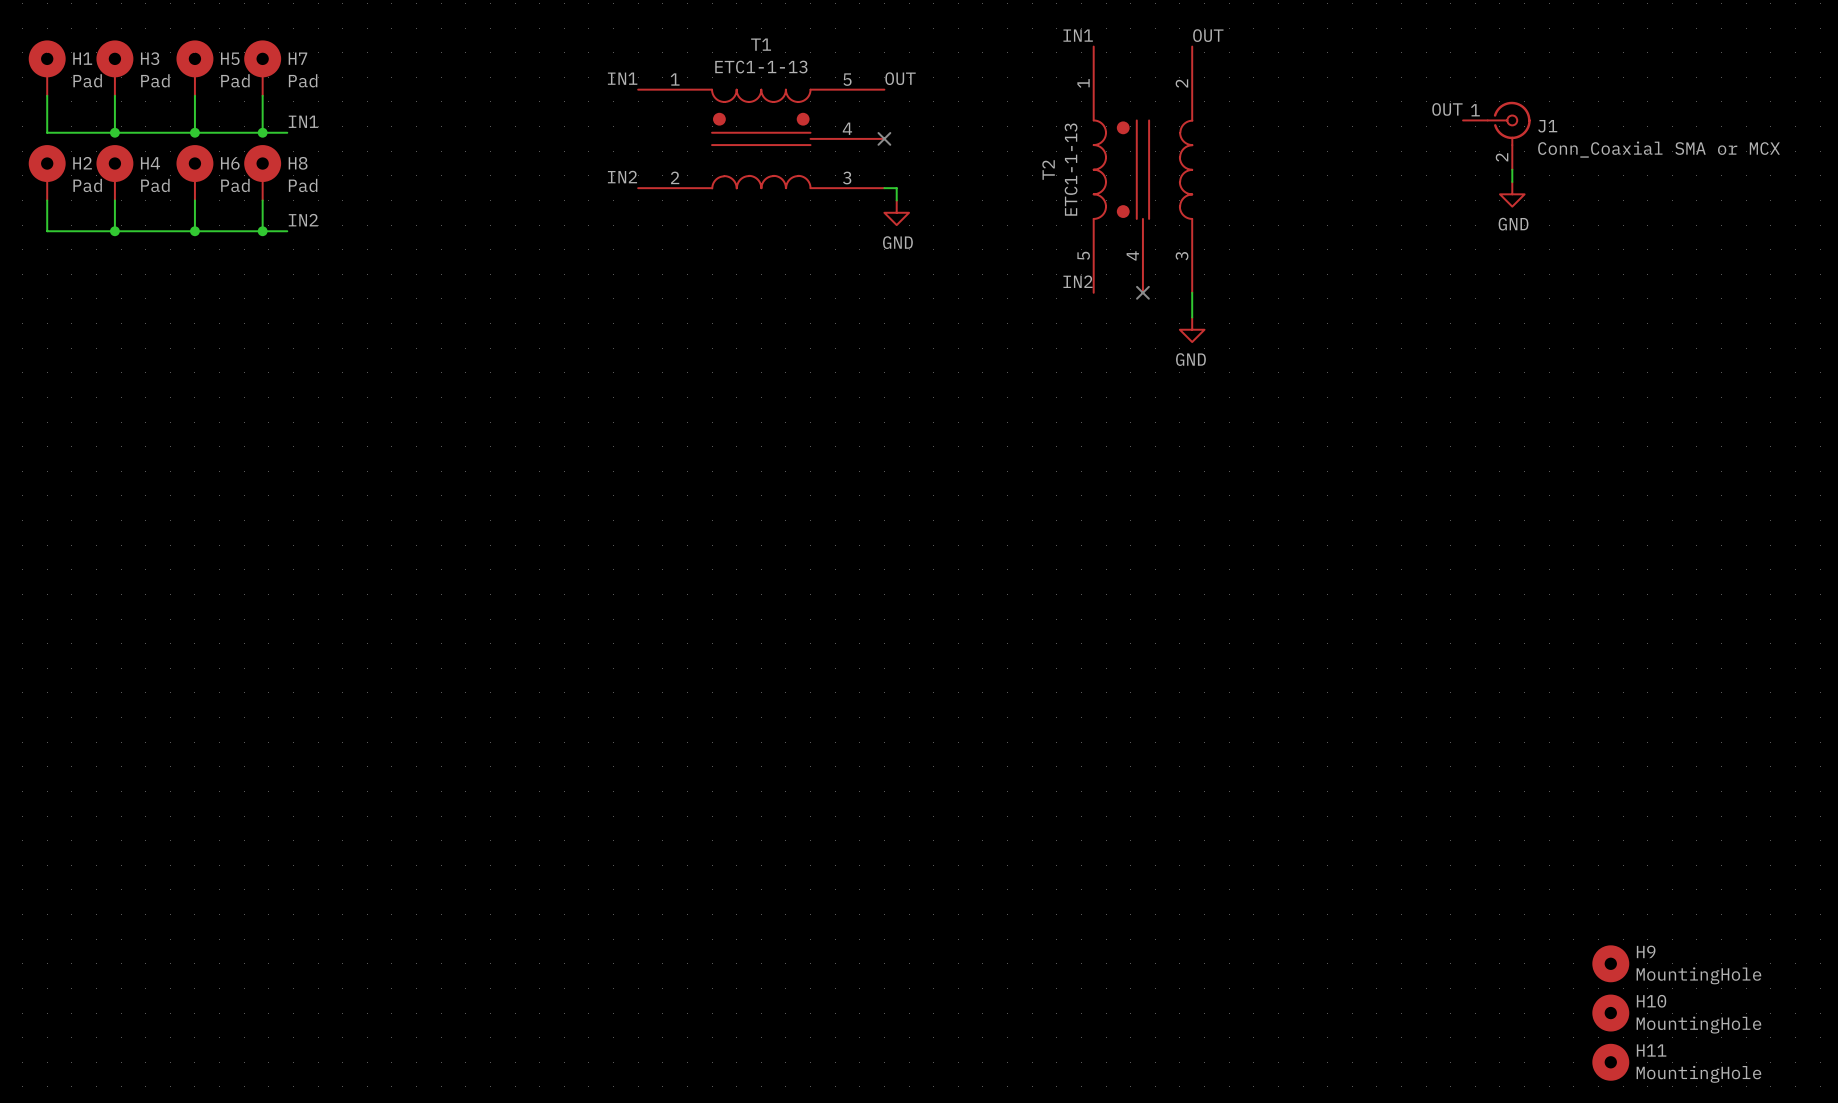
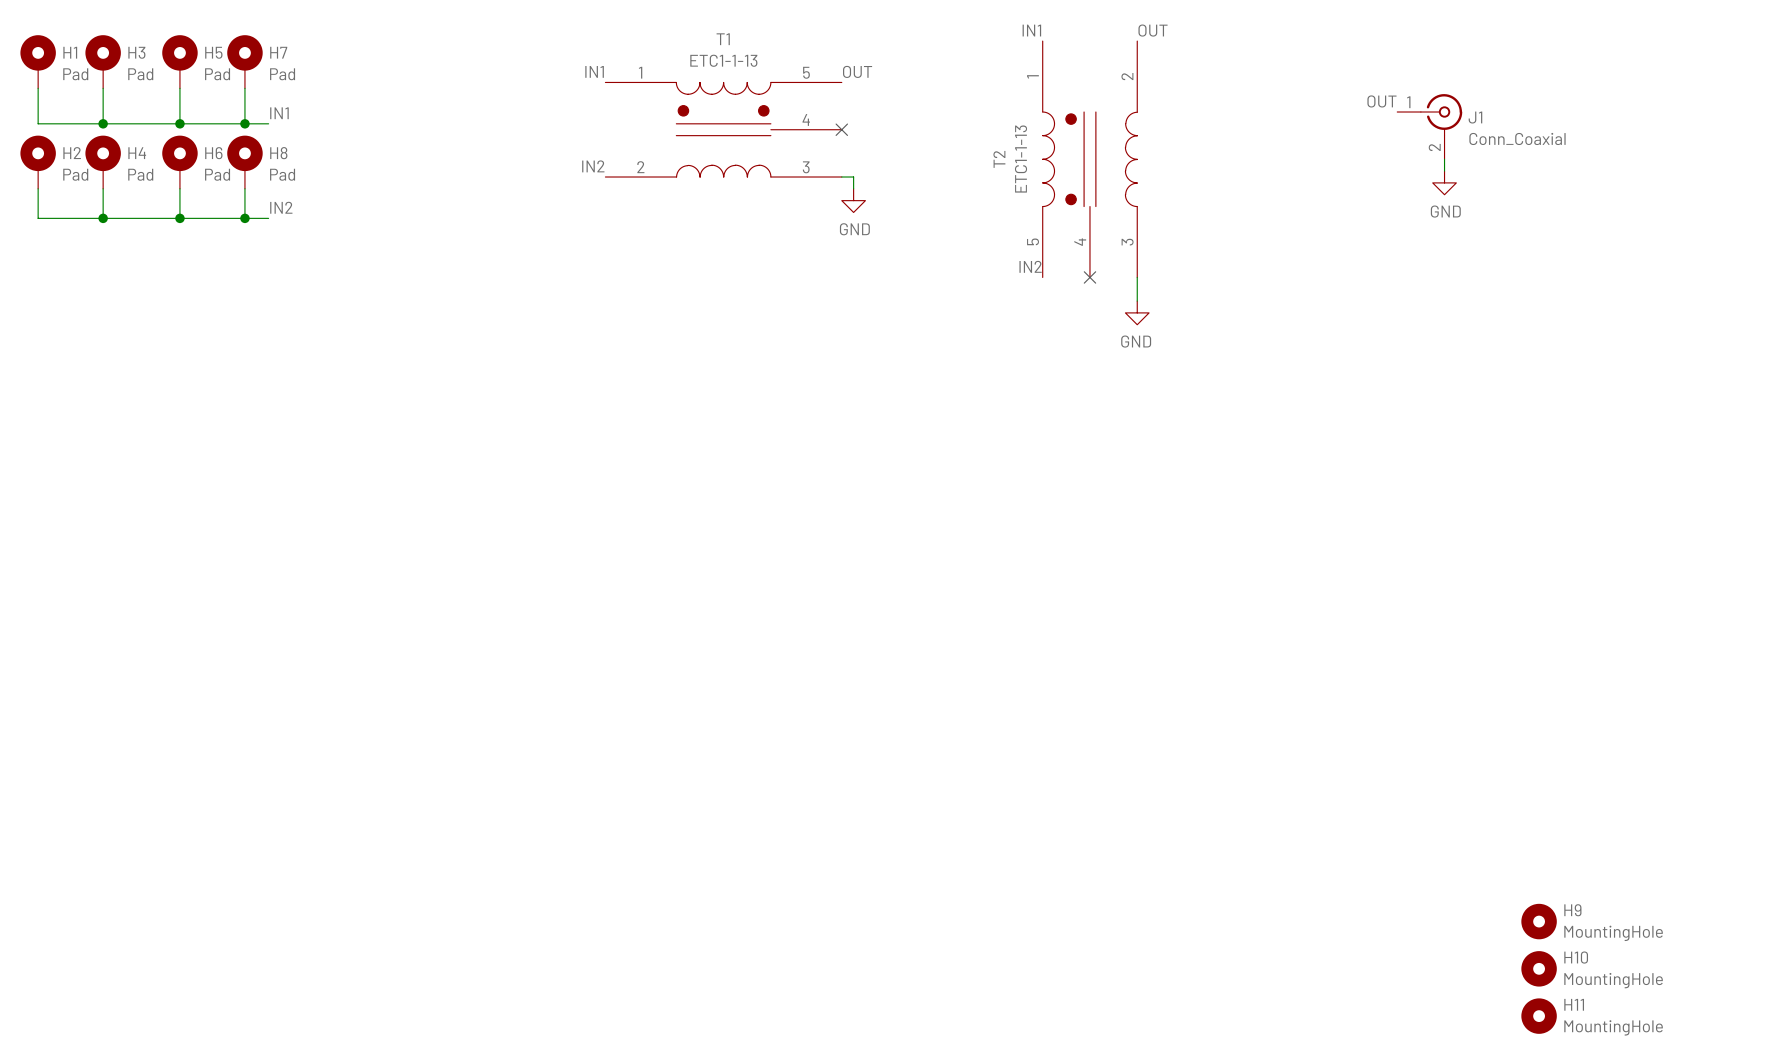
J1 value: Conn_Coaxial SMA or MCX (1659, 149) -> Conn_Coaxial (1517, 138)

